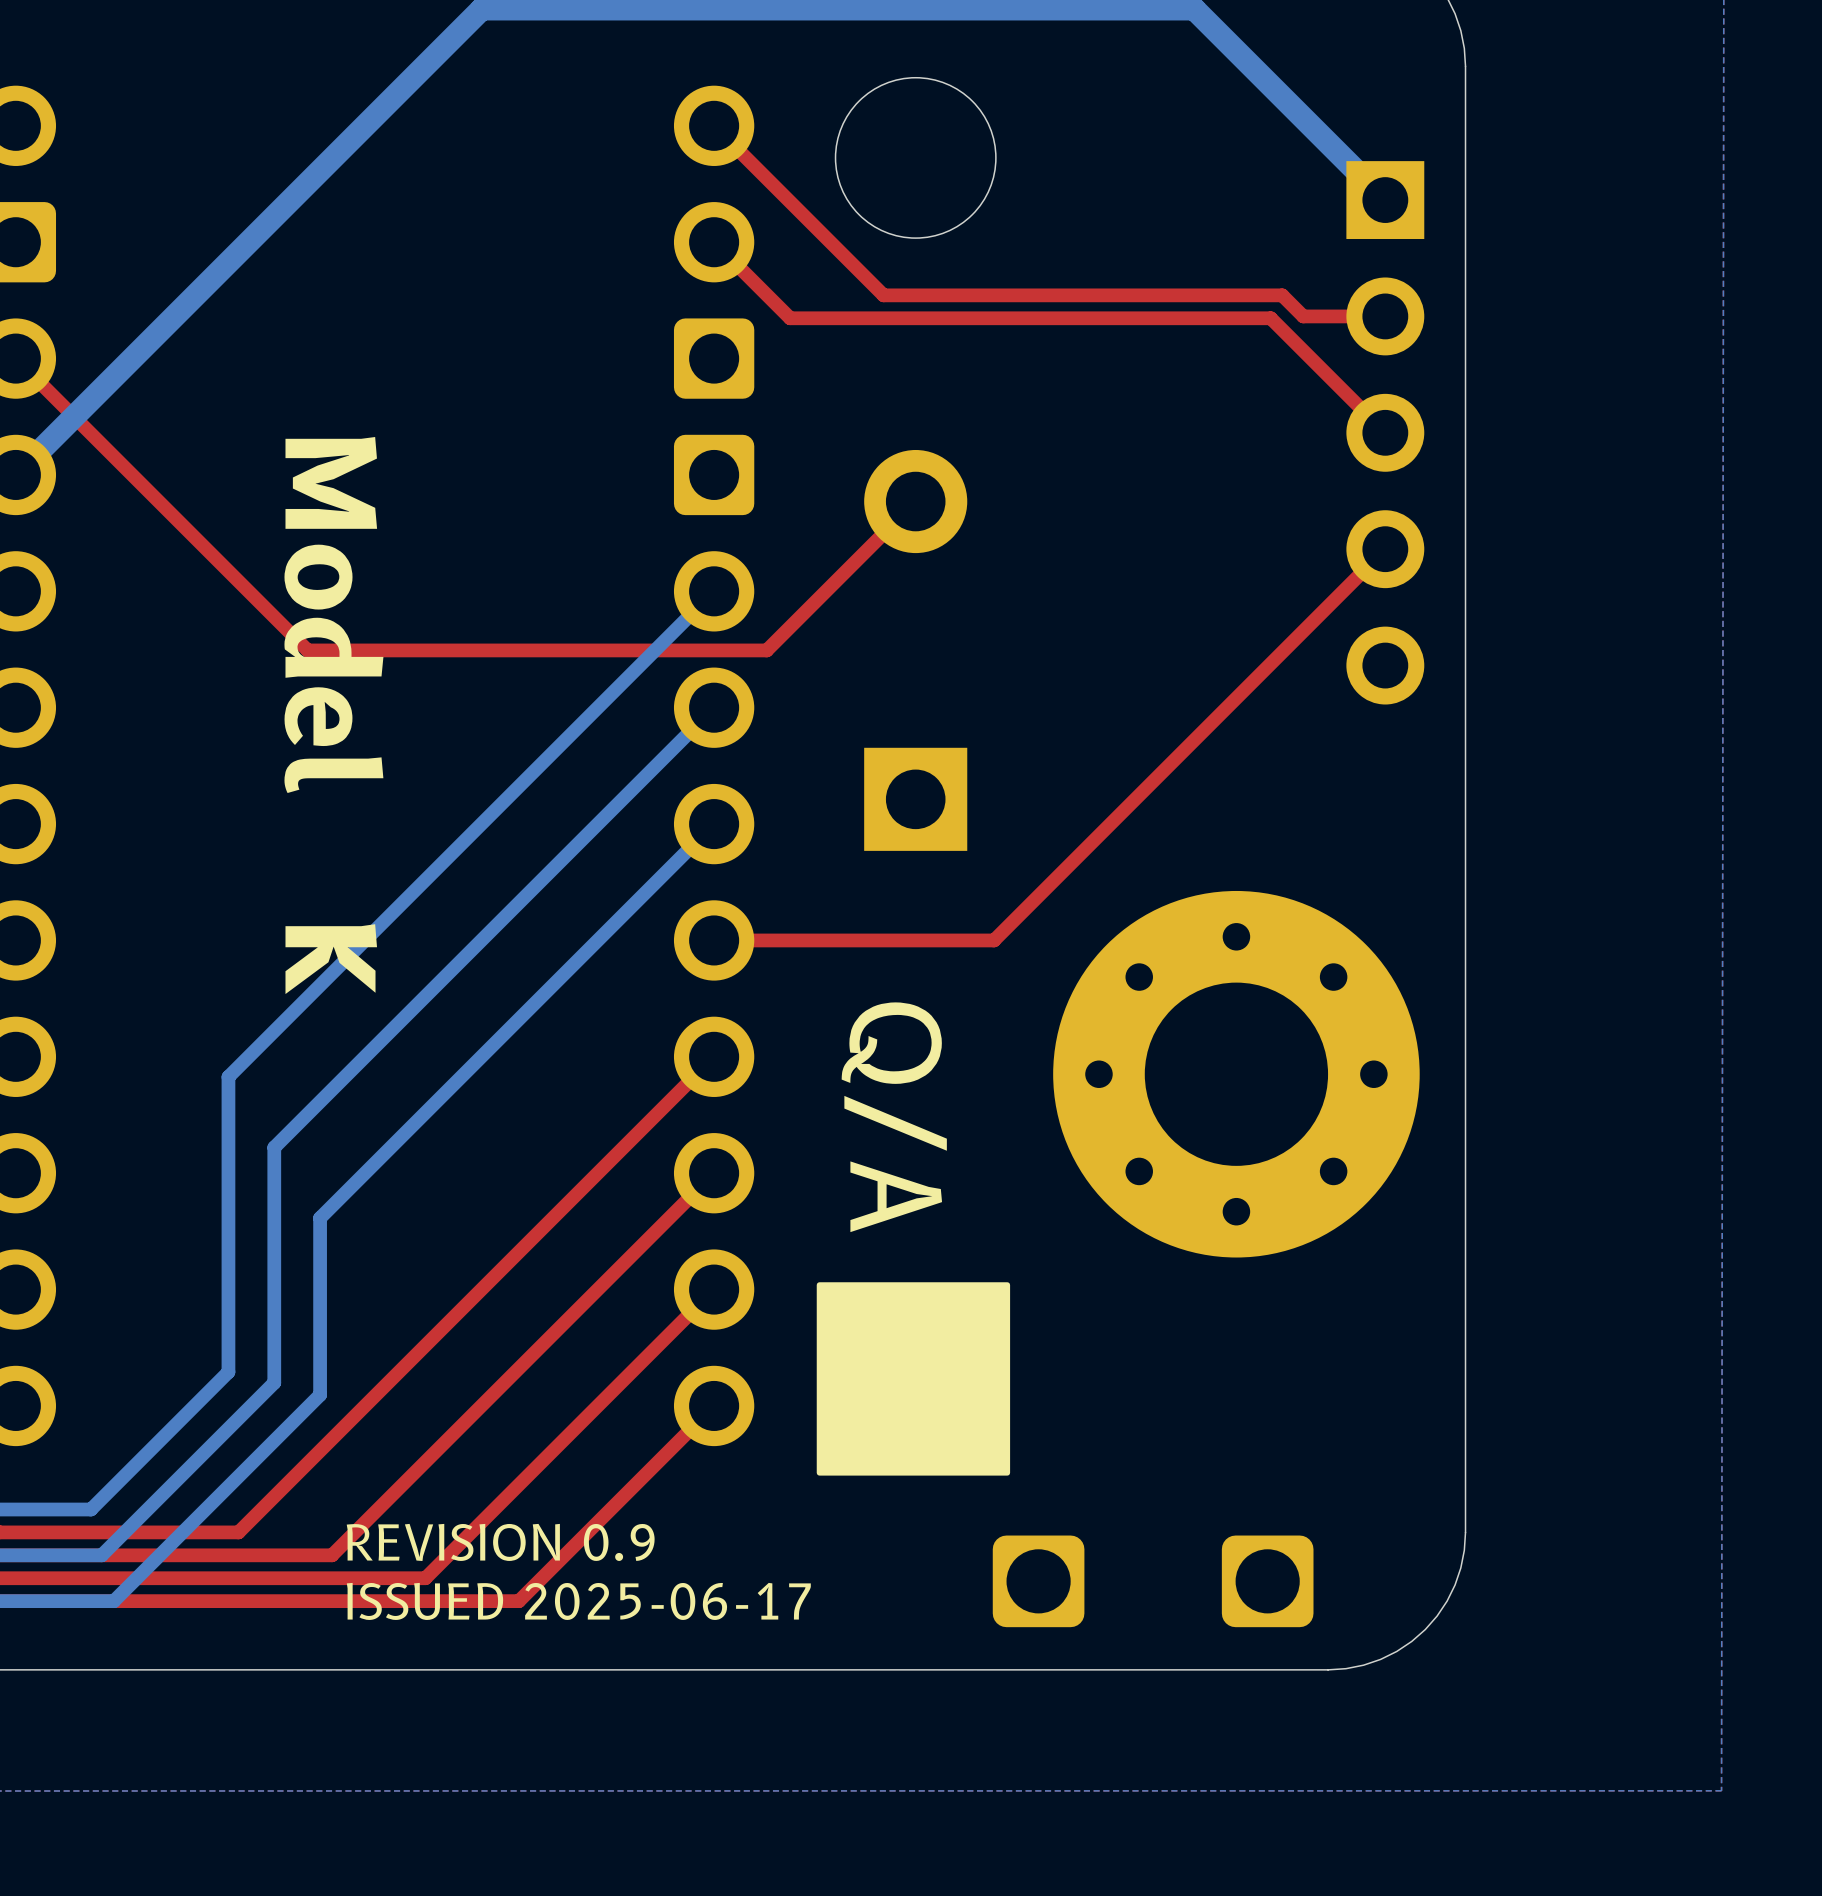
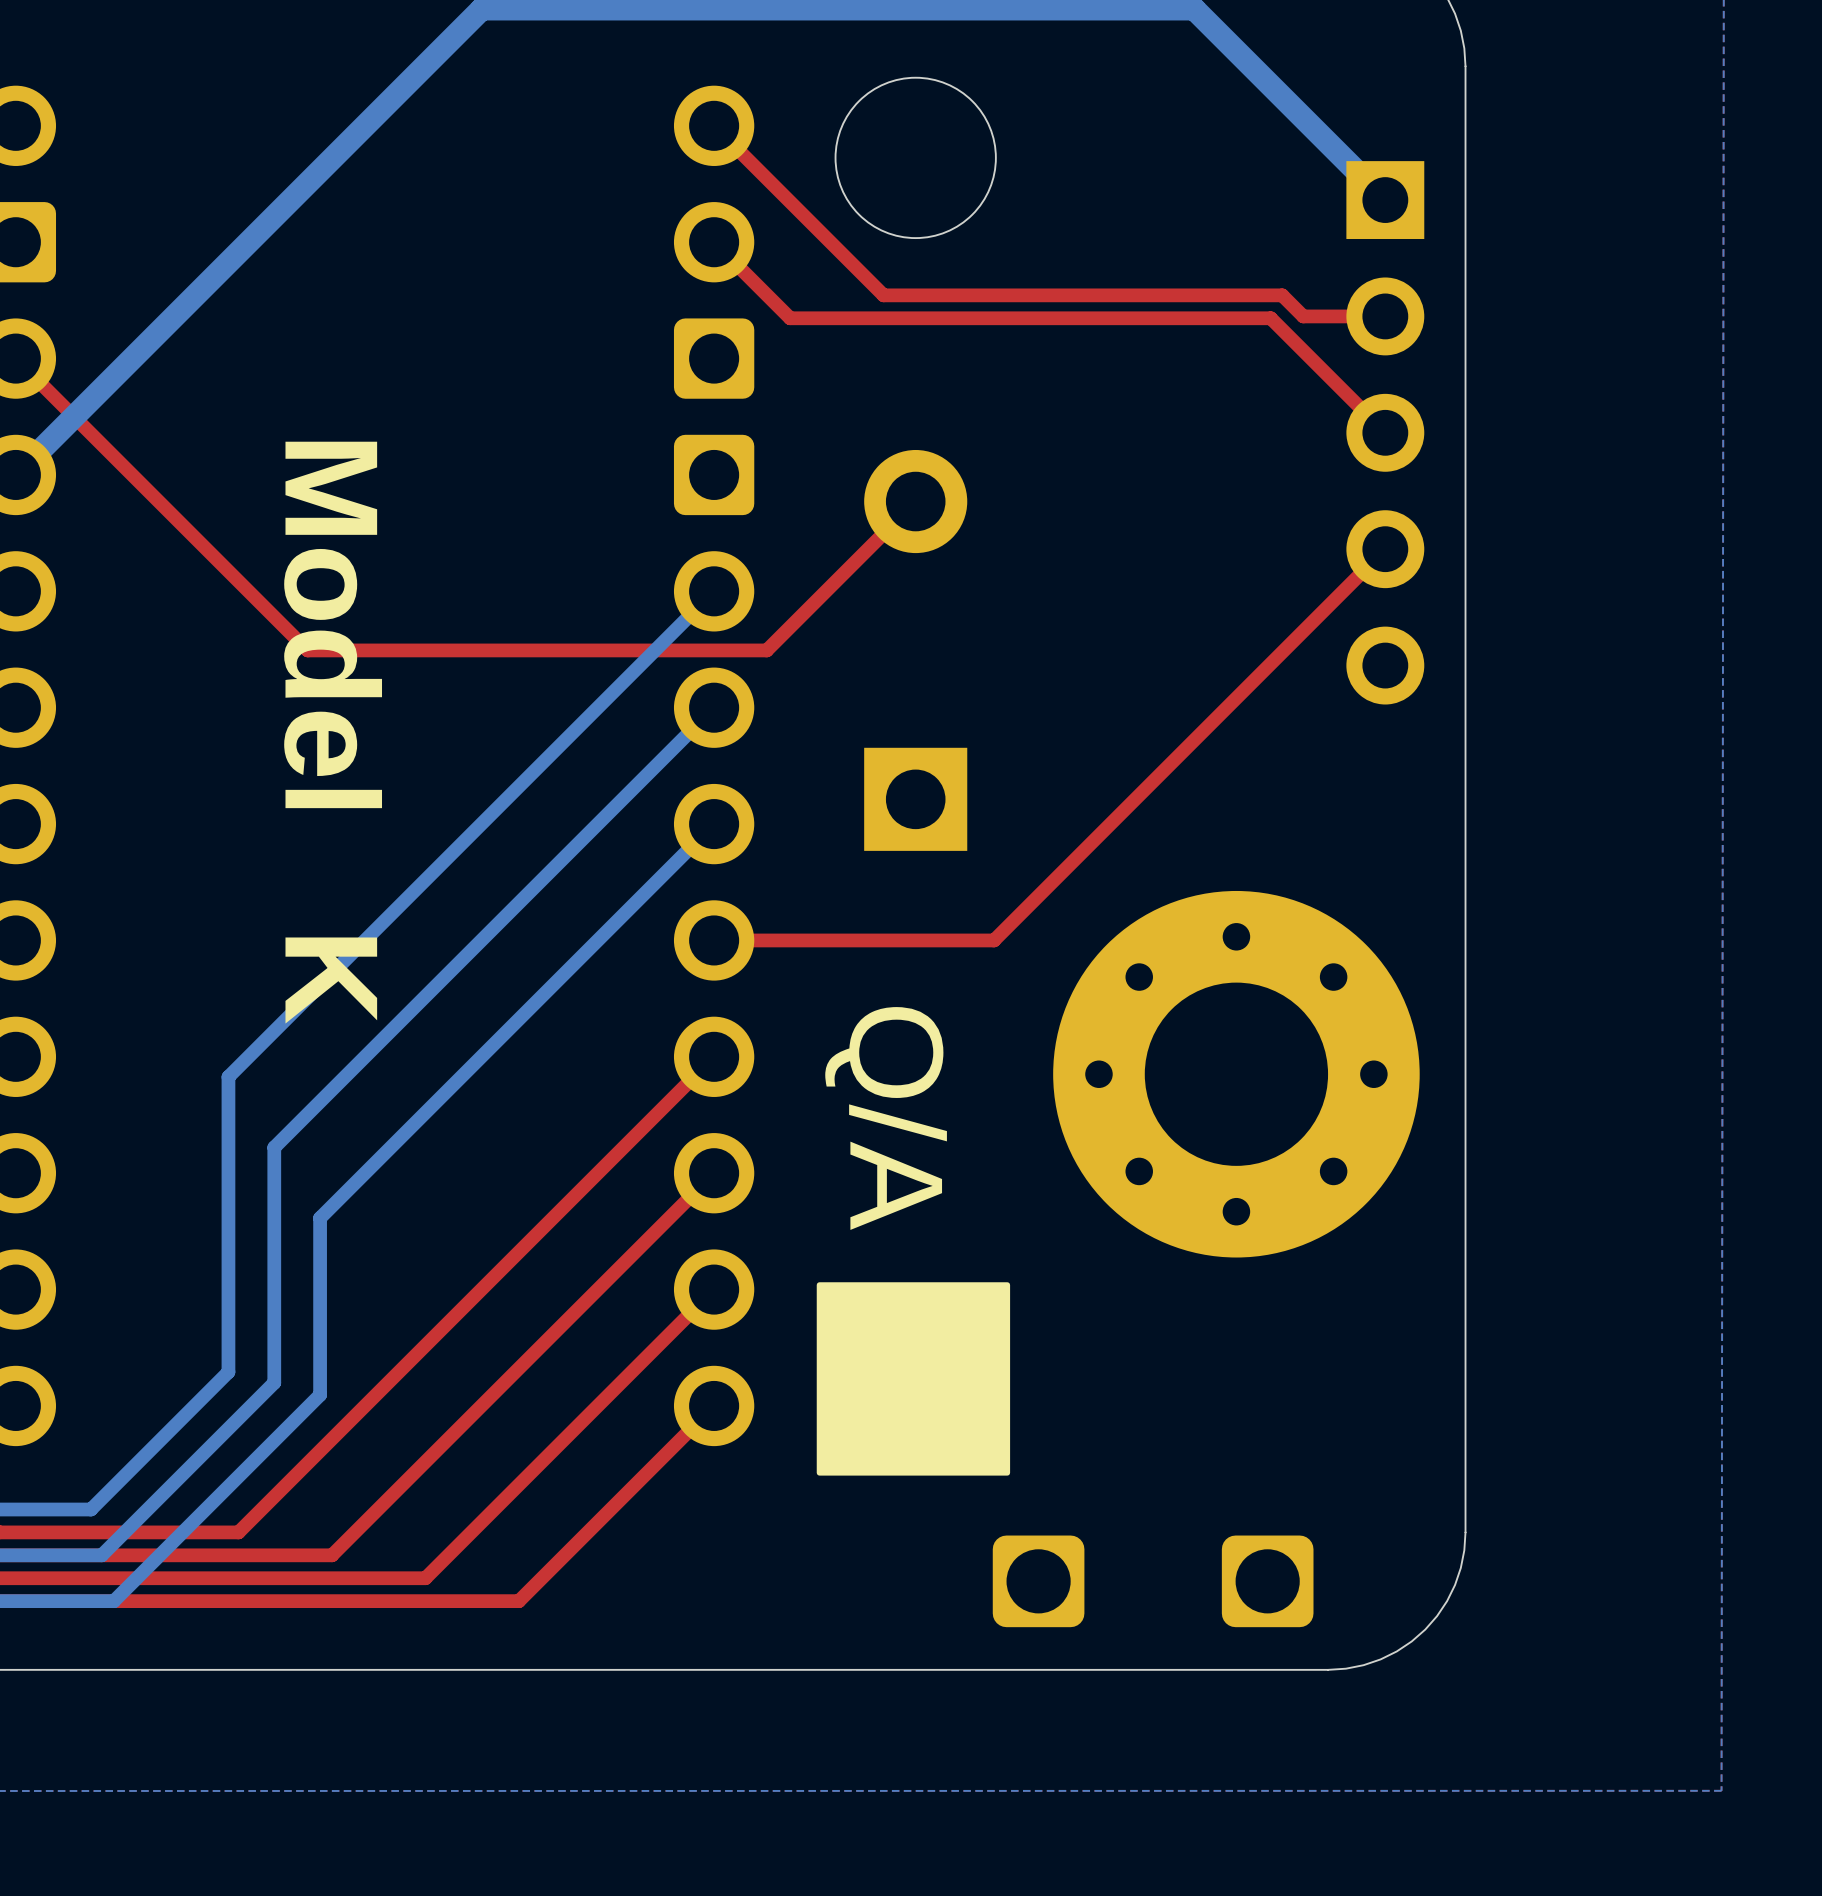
text: REVISION 0.9 (500, 1542) -> none
text: ISSUED 2025-06-17 (578, 1601) -> none

